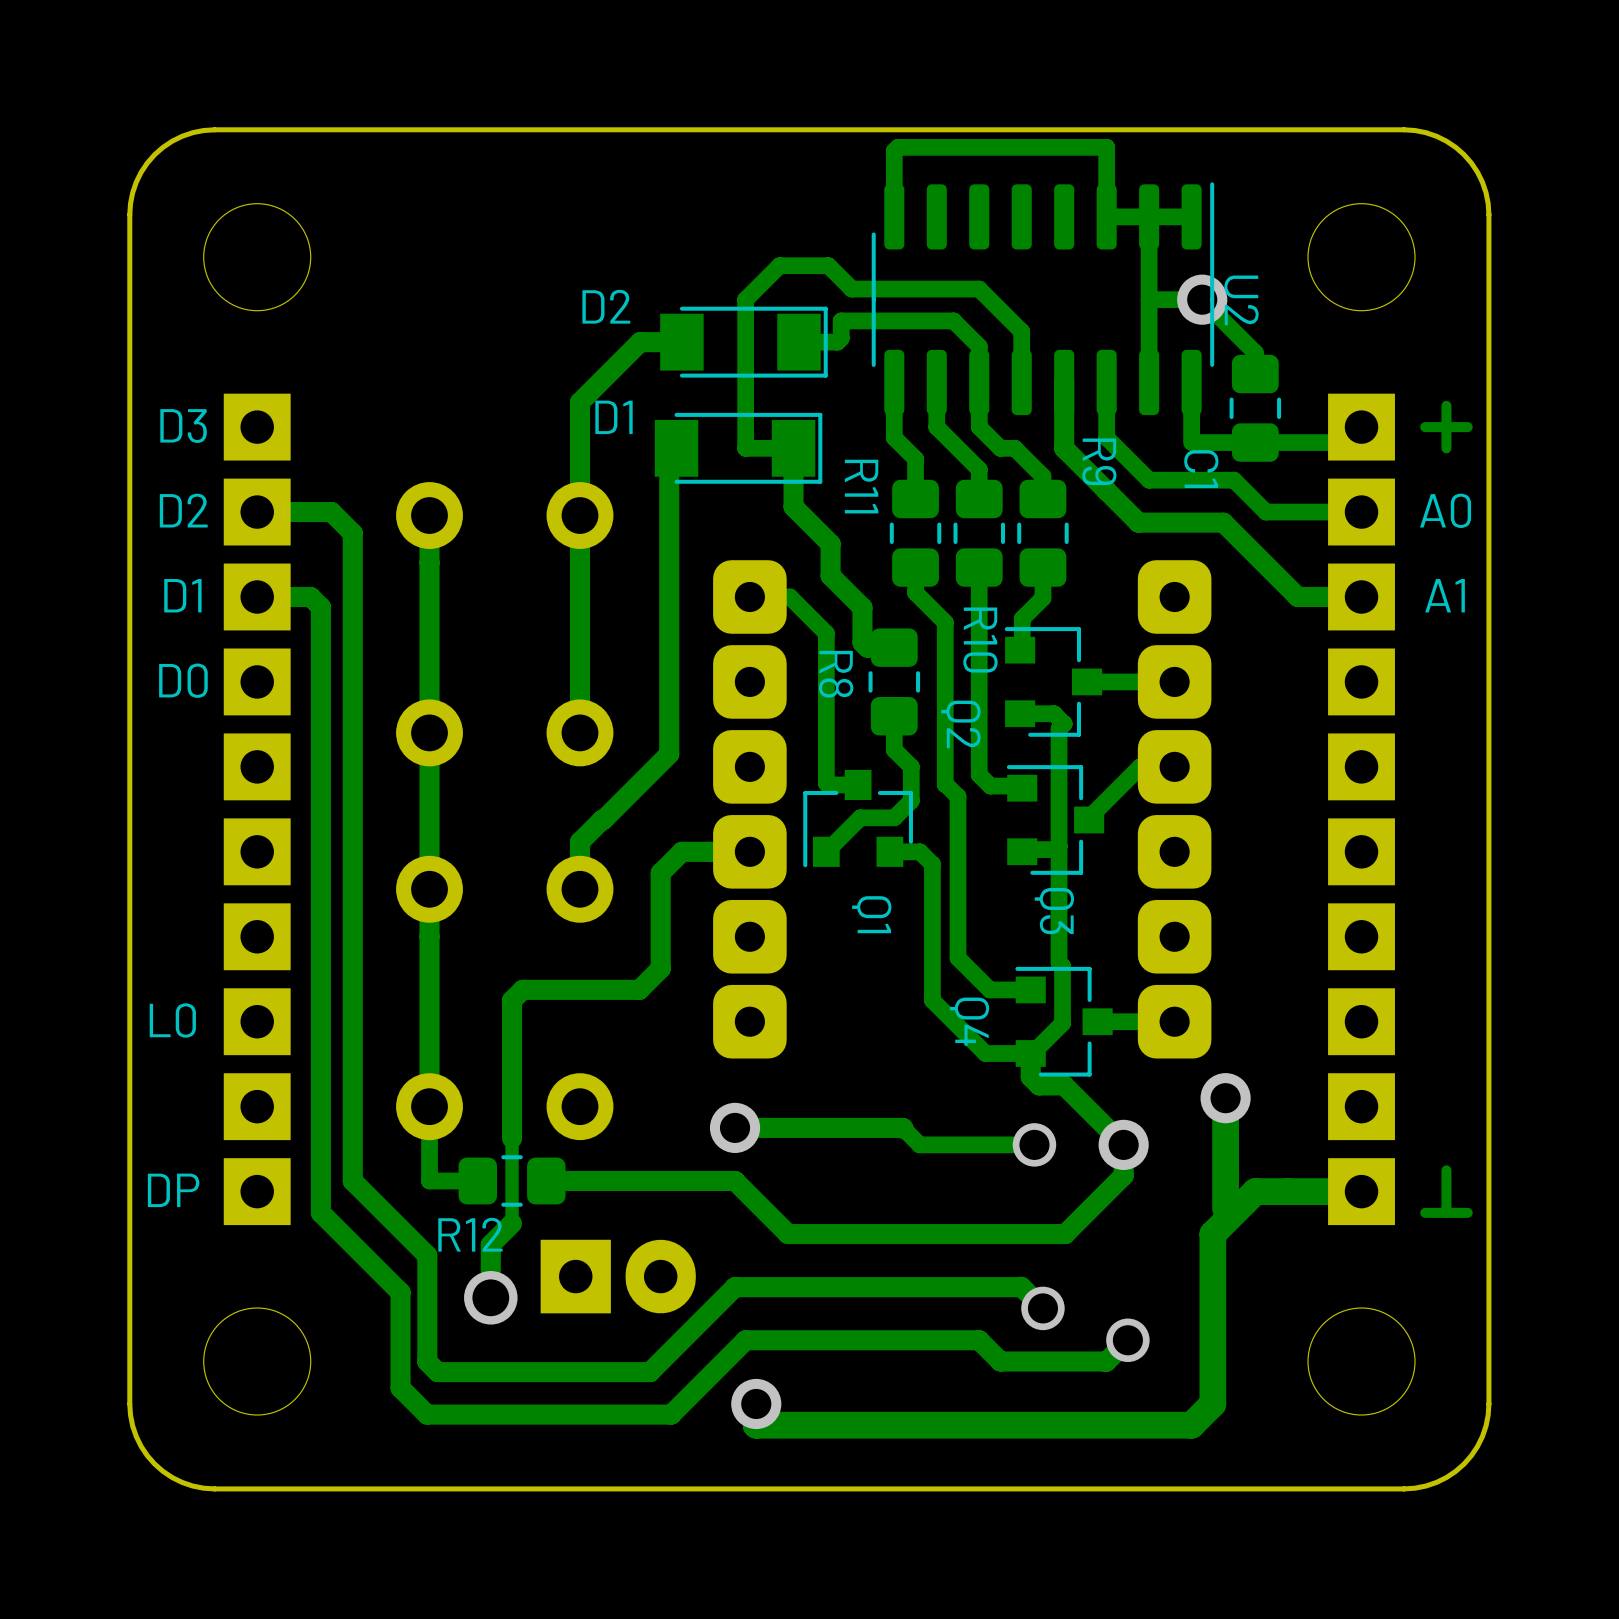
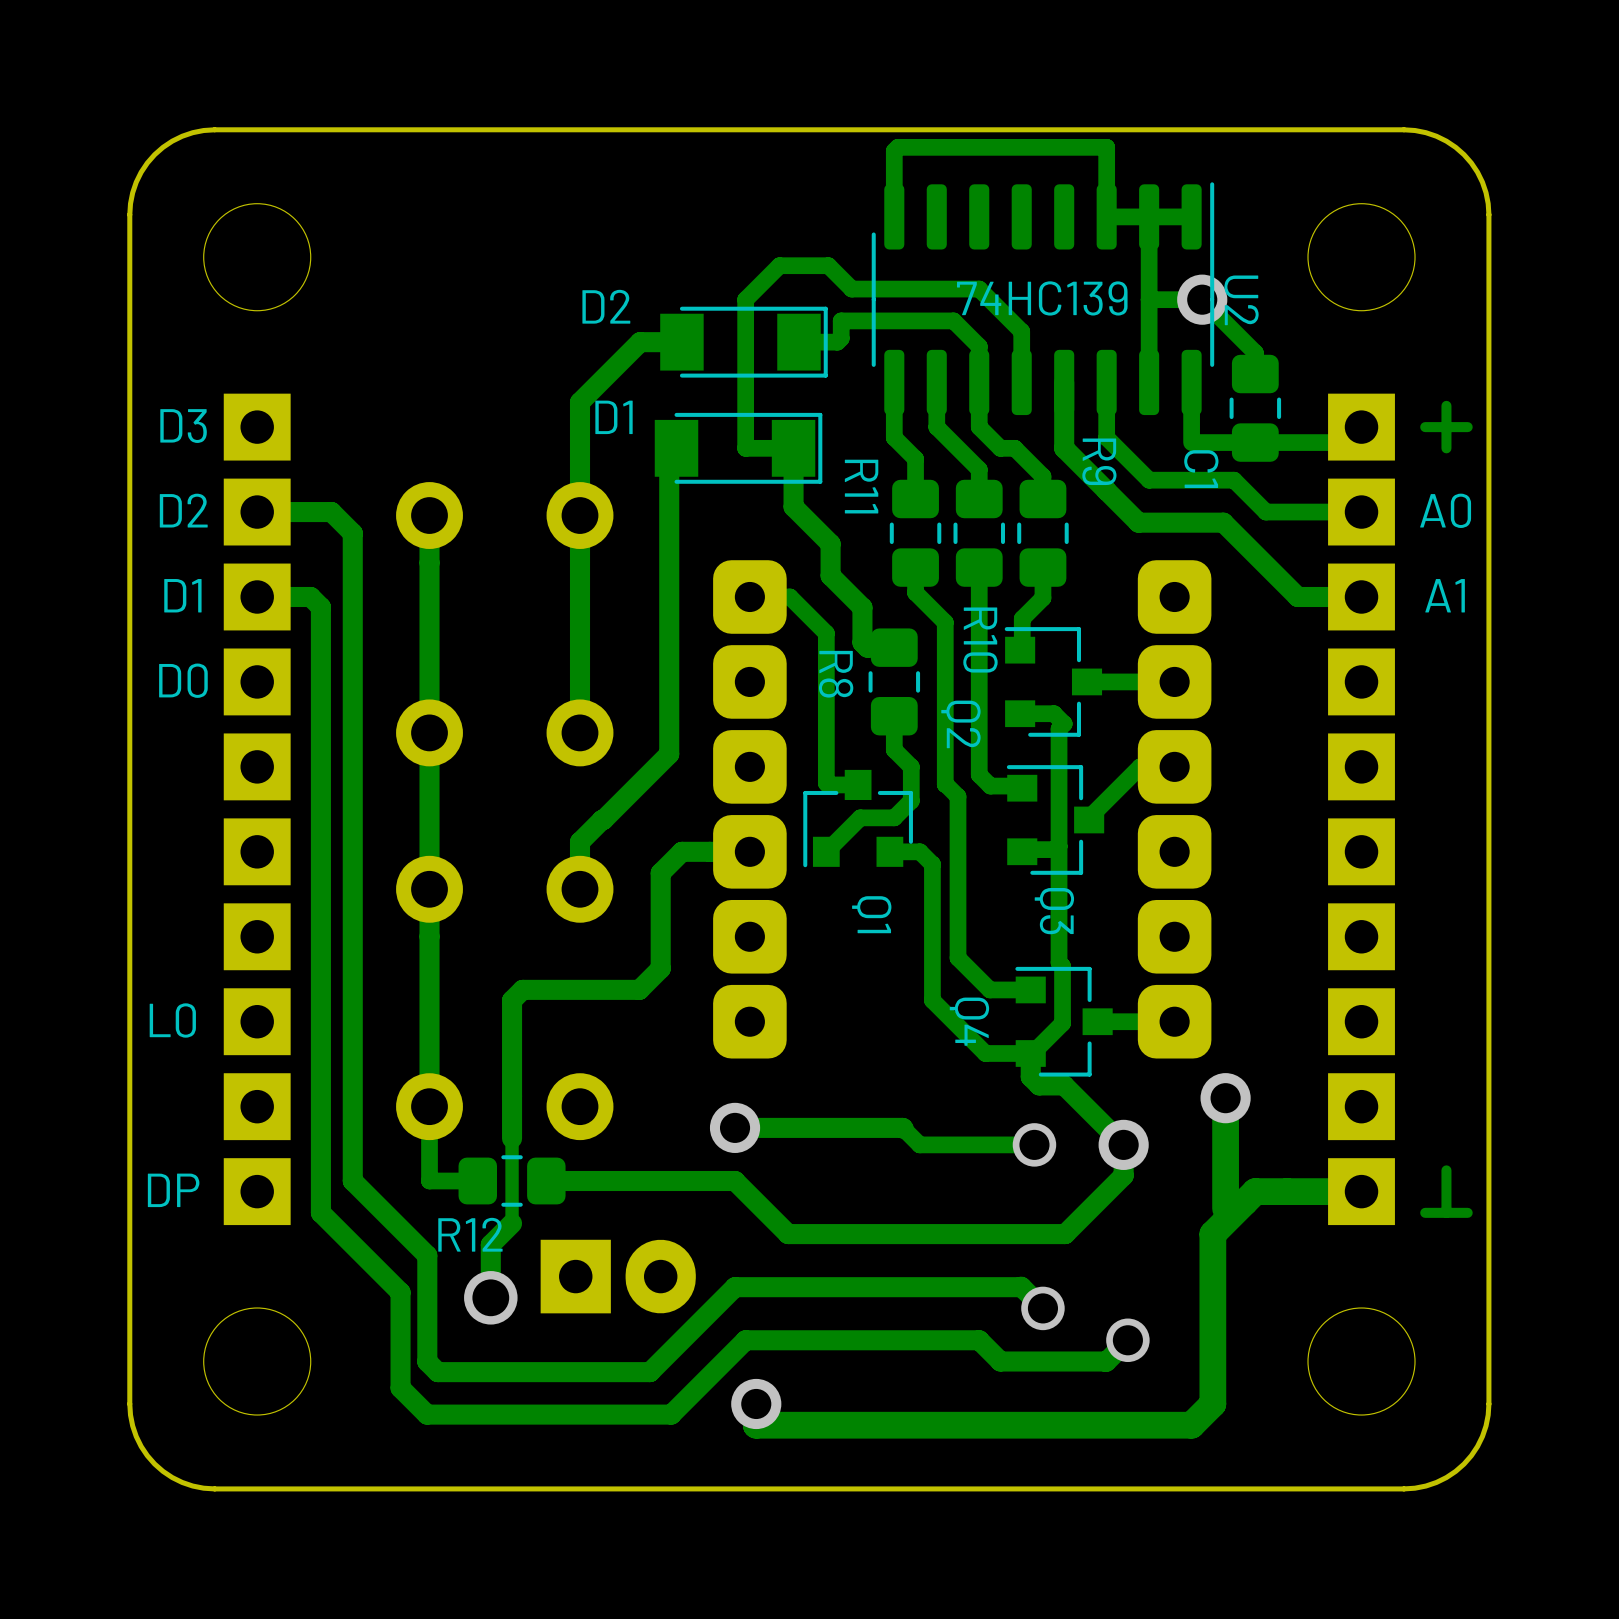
text: none -> 74HC139 (1042, 298)

